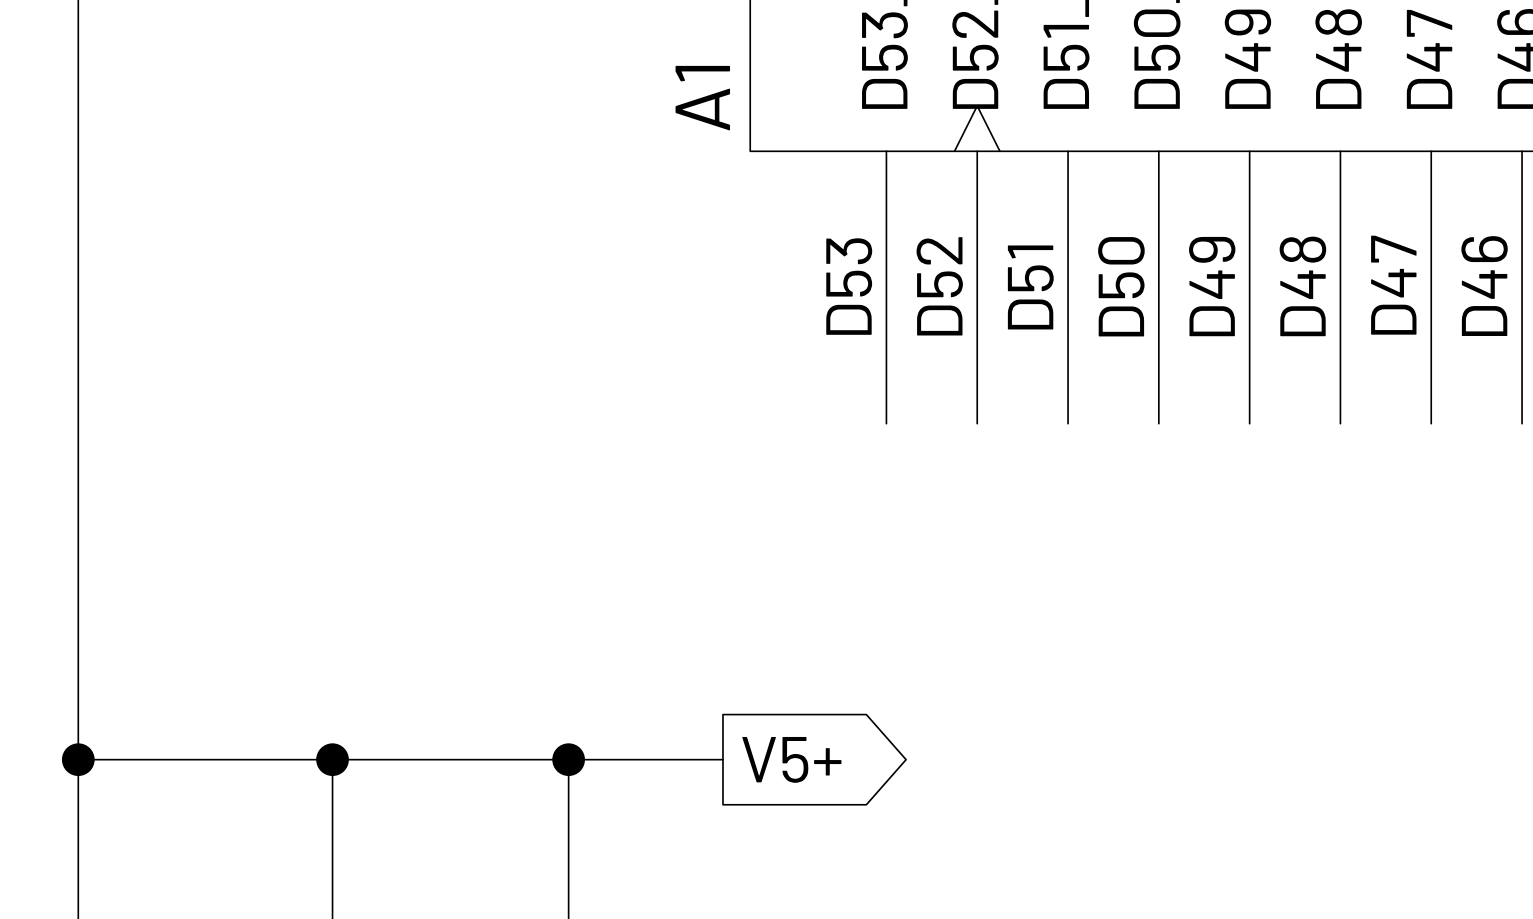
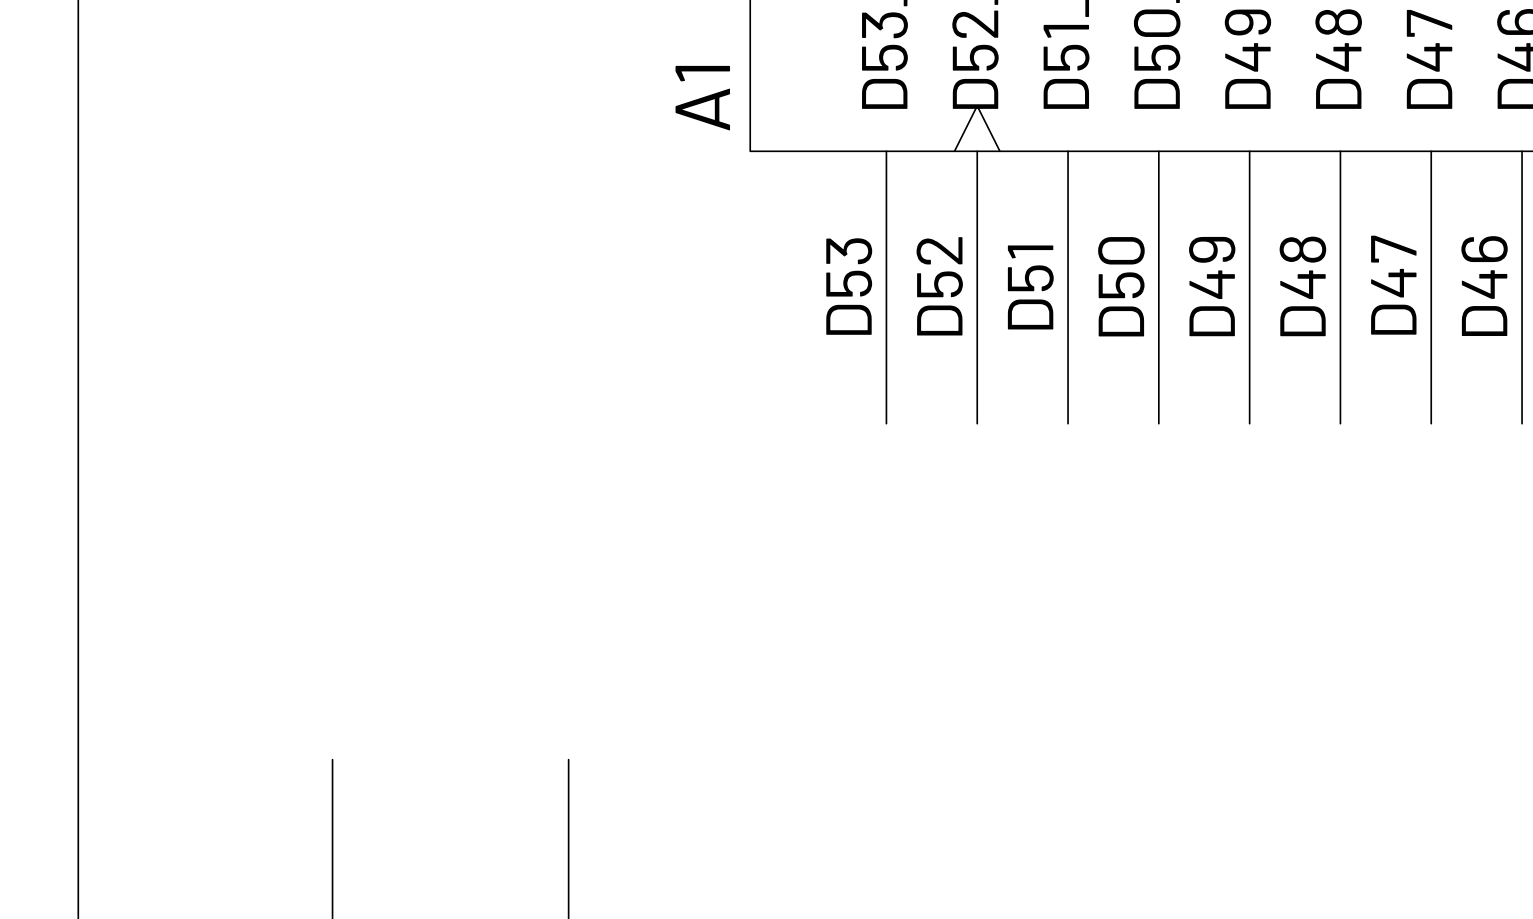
wire: (78, 759) (722, 759) -> none
junction: (78, 759) -> none
junction: (332, 759) -> none
junction: (568, 759) -> none
global label: V5+ (791, 759) -> none

